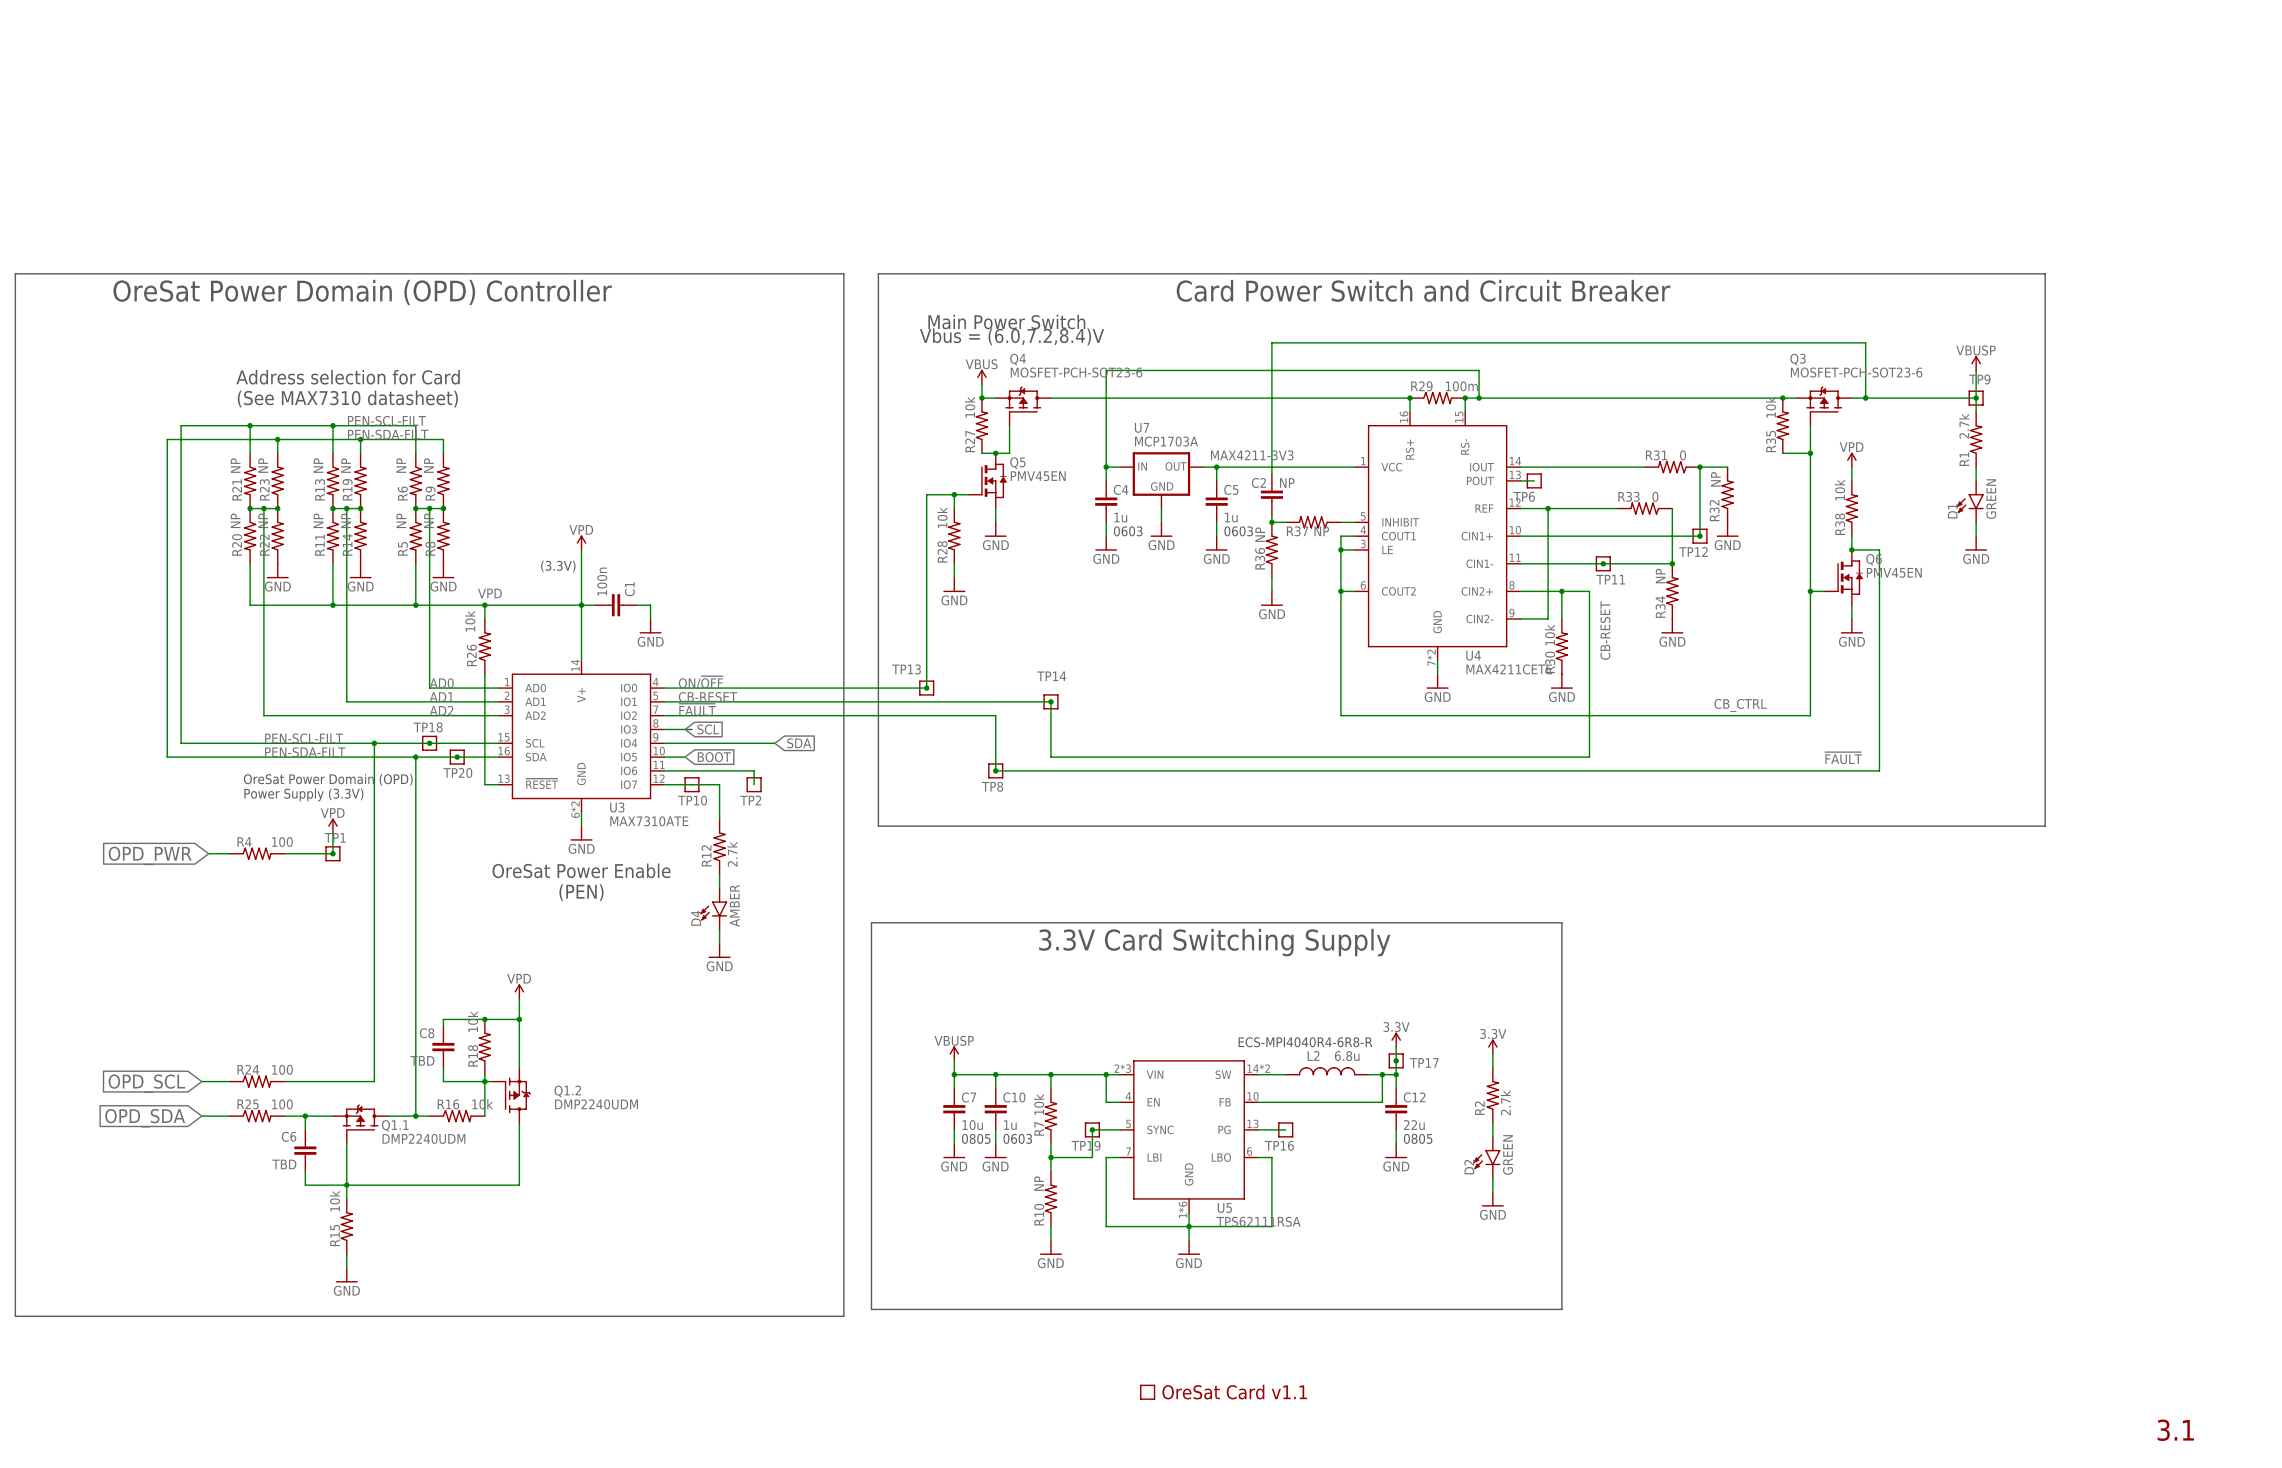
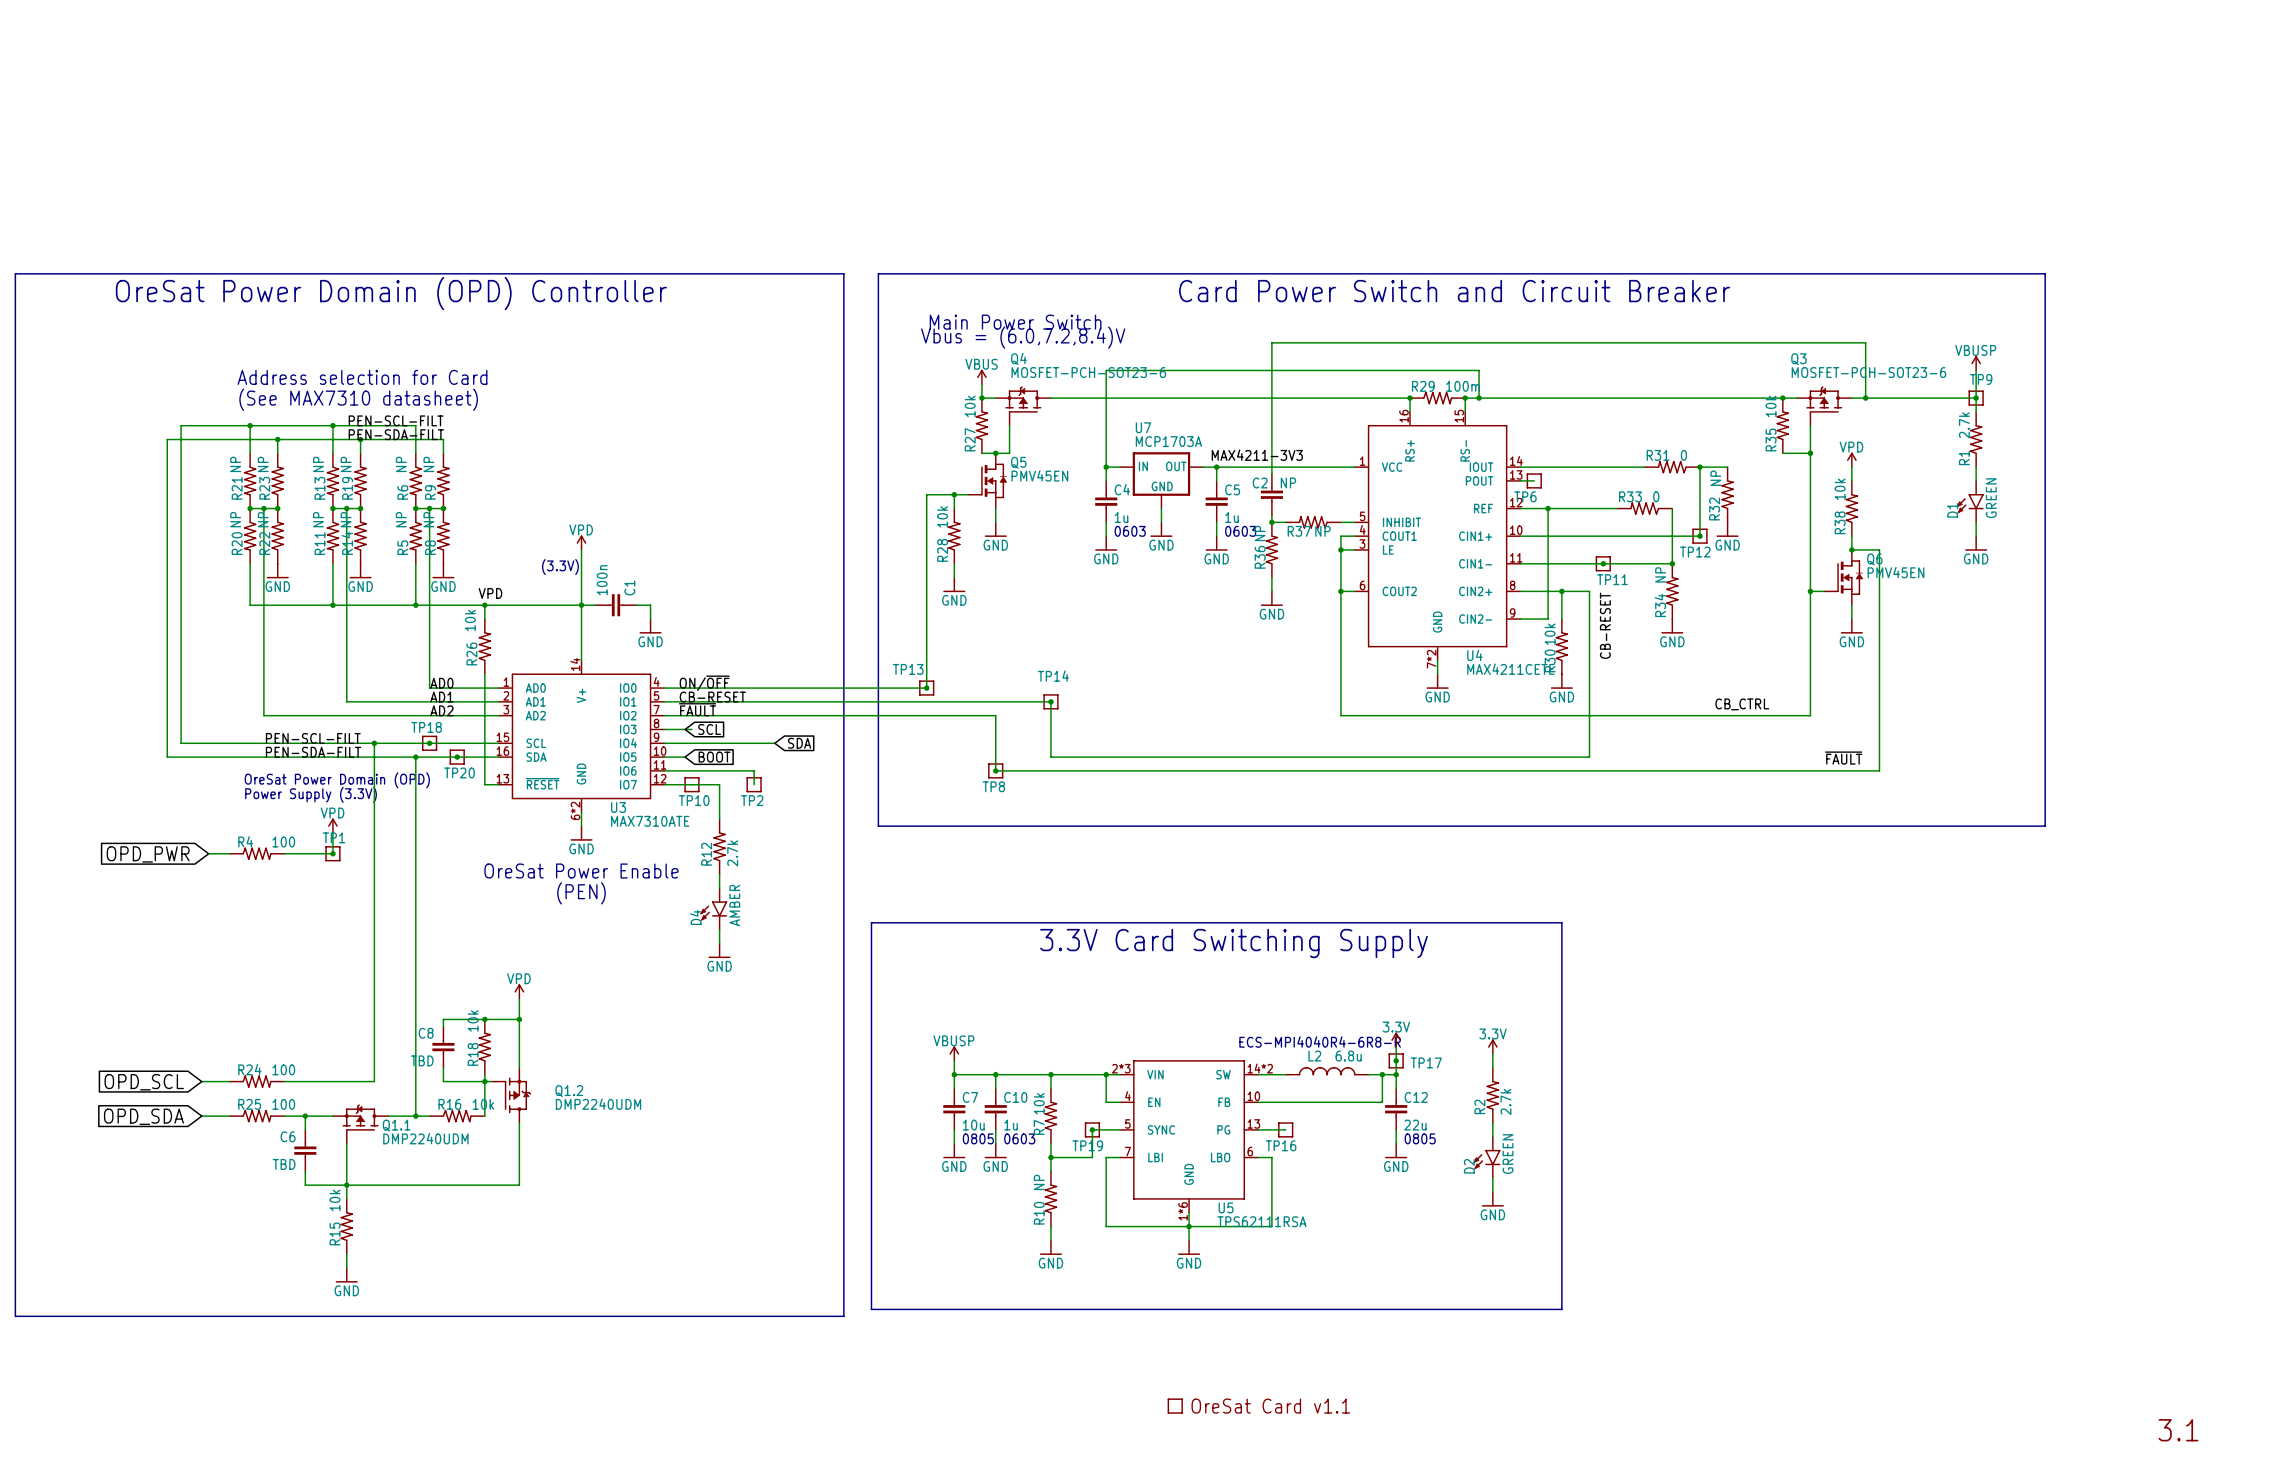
part position: (1147, 1392) -> (1175, 1406)

